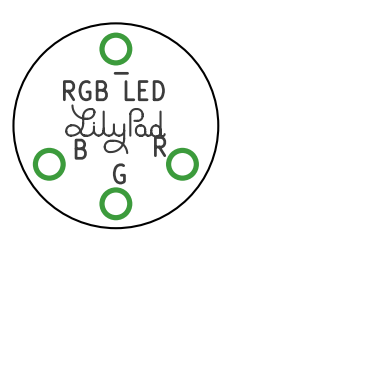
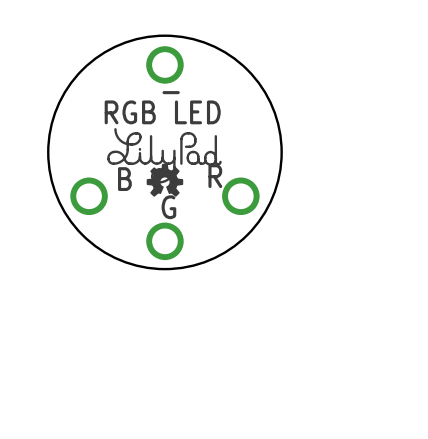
drawing: none -> [146, 163, 184, 197]

